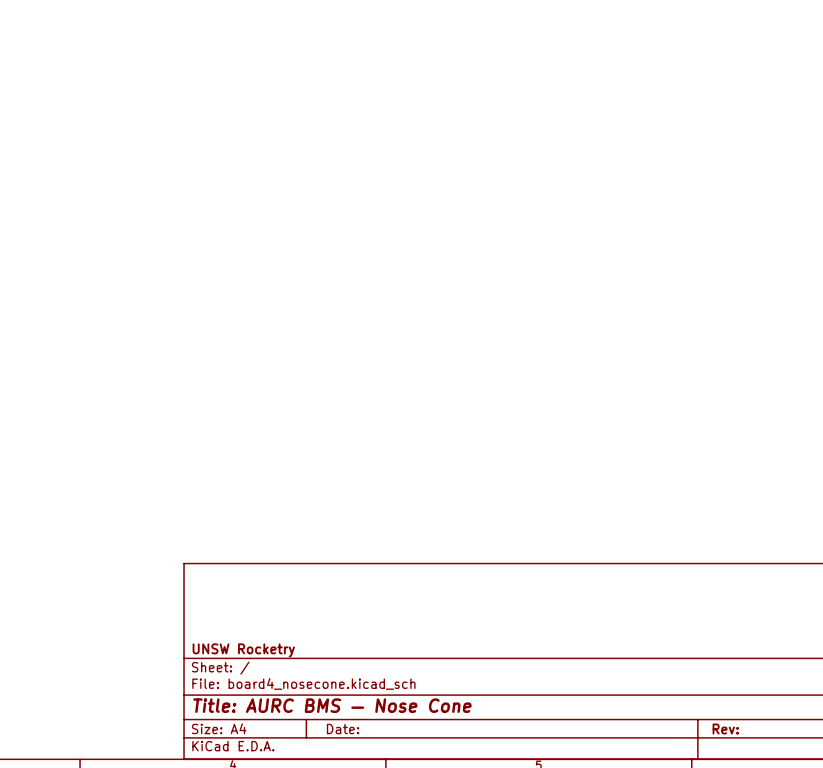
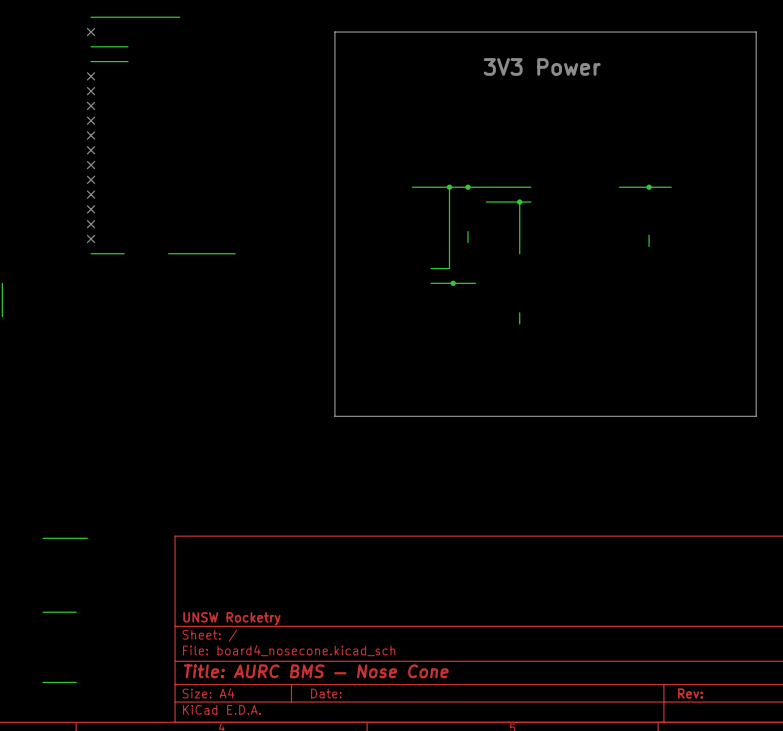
wire: none -> (91, 17) (179, 17)
no-connect mark: none -> (91, 32)
line: none -> (334, 32) (756, 32) (756, 416) (334, 416) (334, 32)
wire: none -> (91, 46) (127, 46)
wire: none -> (91, 61) (127, 61)
text: none -> 3V3 Power (542, 66)
no-connect mark: none -> (91, 76)
no-connect mark: none -> (91, 91)
no-connect mark: none -> (91, 105)
no-connect mark: none -> (91, 120)
no-connect mark: none -> (91, 135)
no-connect mark: none -> (91, 150)
no-connect mark: none -> (91, 165)
no-connect mark: none -> (91, 179)
wire: none -> (412, 187) (530, 187)
wire: none -> (449, 187) (449, 268) (431, 268)
junction: none -> (449, 187)
junction: none -> (467, 187)
wire: none -> (619, 187) (671, 187)
junction: none -> (649, 187)
no-connect mark: none -> (91, 194)
wire: none -> (486, 202) (530, 202)
wire: none -> (519, 202) (519, 253)
junction: none -> (519, 202)
no-connect mark: none -> (91, 209)
no-connect mark: none -> (91, 224)
wire: none -> (467, 231) (467, 242)
wire: none -> (649, 235) (649, 246)
no-connect mark: none -> (91, 238)
wire: none -> (91, 253) (124, 253)
wire: none -> (168, 253) (235, 253)
wire: none -> (2, 283) (2, 316)
wire: none -> (431, 283) (475, 283)
junction: none -> (453, 283)
wire: none -> (519, 312) (519, 323)
wire: none -> (42, 538) (87, 538)
wire: none -> (42, 612) (76, 612)
wire: none -> (42, 682) (76, 682)

